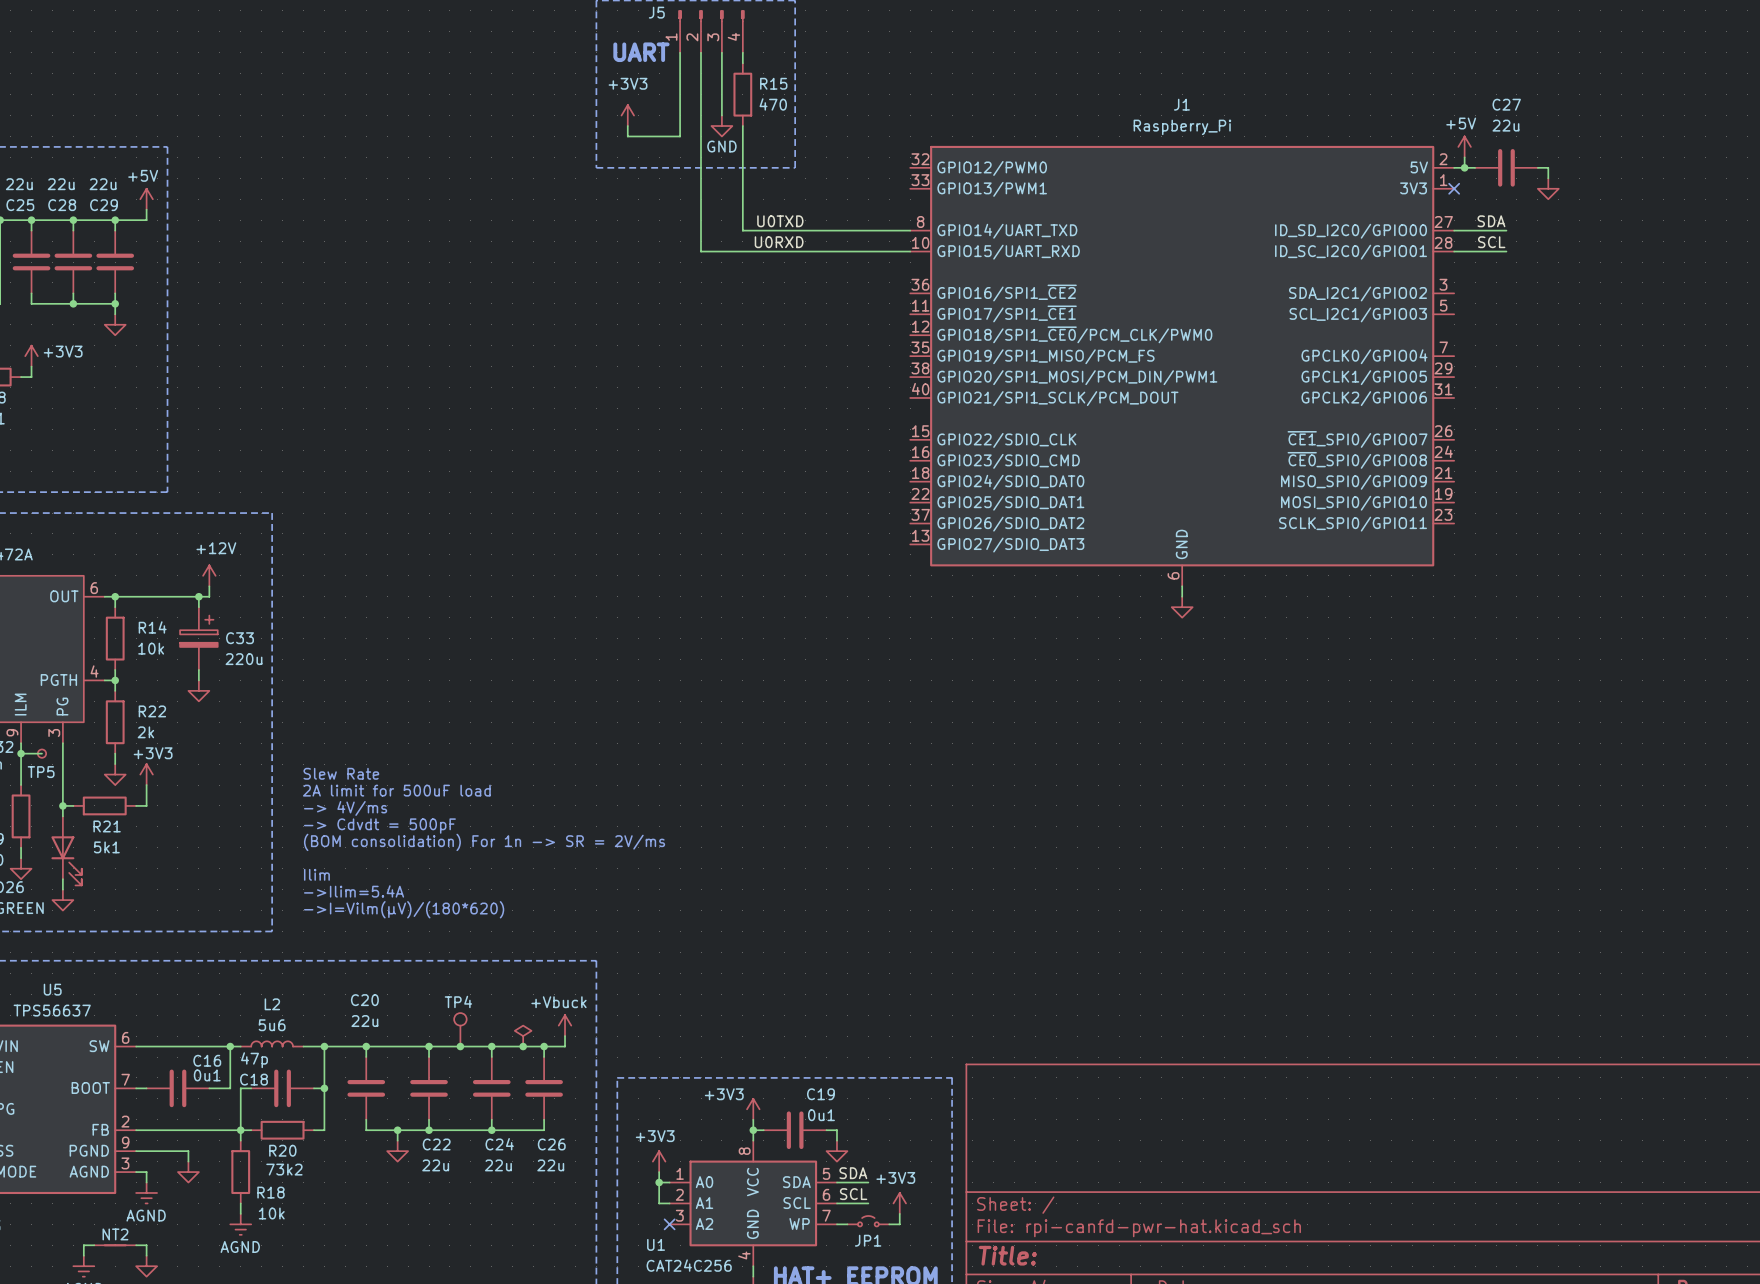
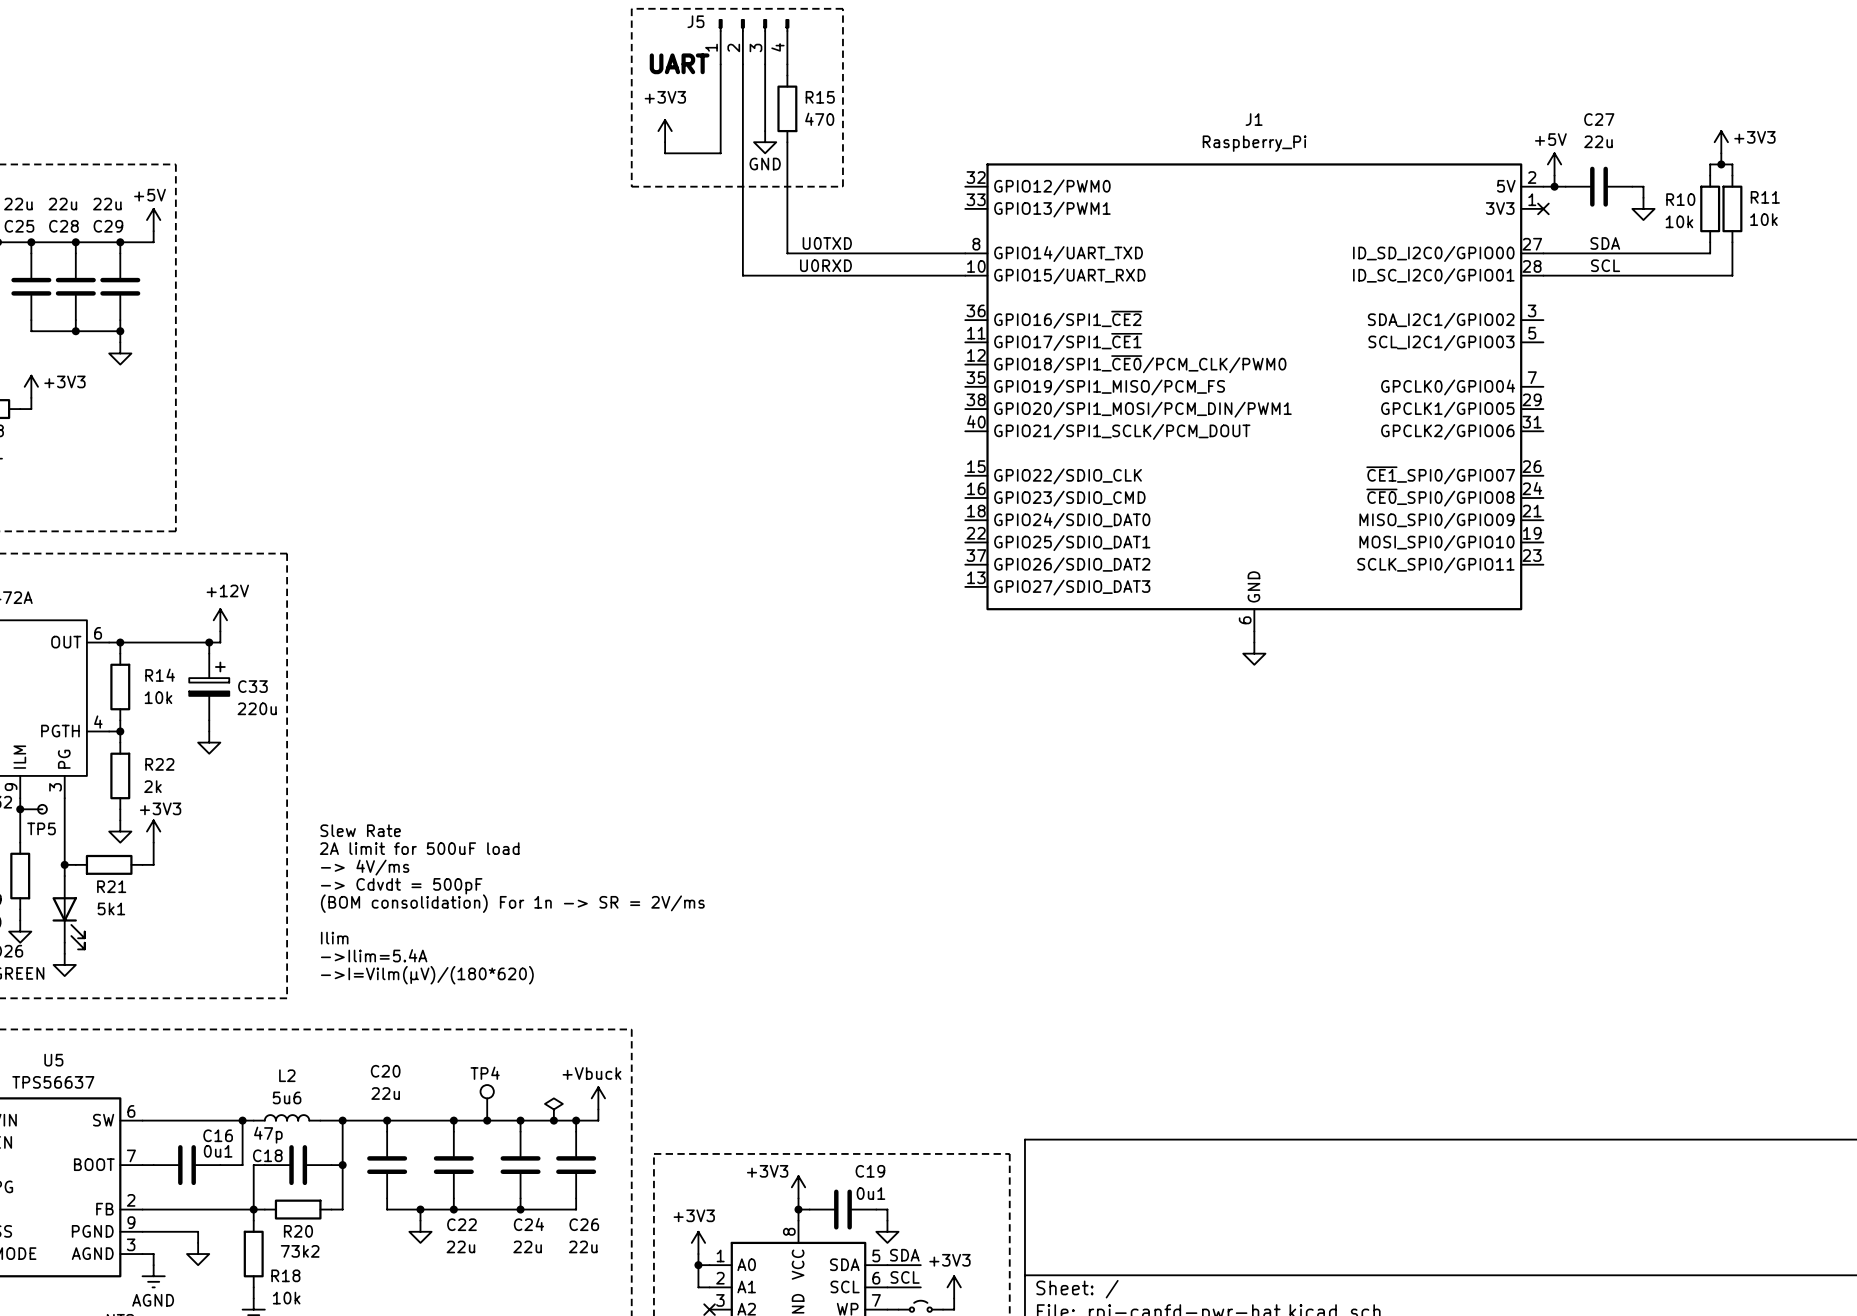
power symbol: none -> +3V3 (1721, 142)
wire: none -> (1721, 153) (1721, 164)
junction: none -> (1721, 164)
wire: none -> (1710, 175) (1710, 164) (1732, 164) (1732, 175)
R10: none -> 10k (1710, 208)
R11: none -> 10k (1732, 208)
wire: none -> (1710, 242) (1710, 253) (1599, 253)
wire: none -> (1732, 242) (1732, 275) (1599, 275)
label position: SDA (1491, 221) -> SDA (1605, 243)
label position: SCL (1491, 242) -> SCL (1605, 265)

